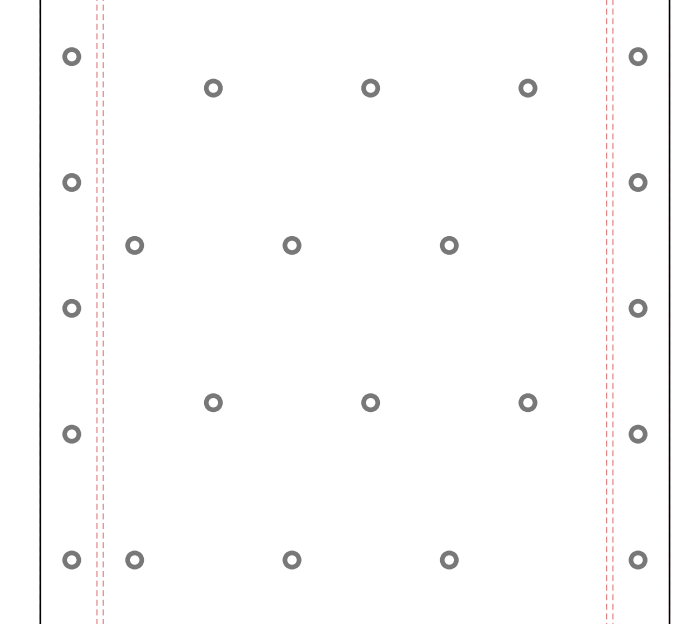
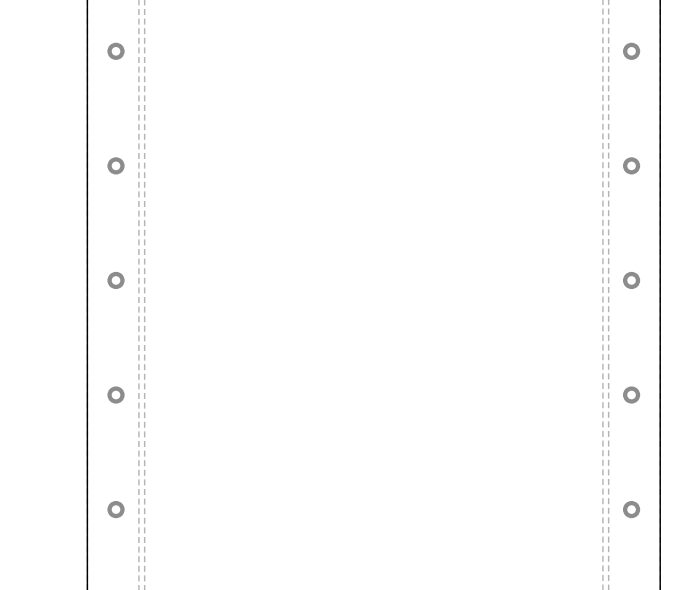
via: (213, 88) -> none
via: (370, 88) -> none
via: (527, 88) -> none
via: (134, 245) -> none
via: (292, 245) -> none
via: (449, 245) -> none
via: (213, 402) -> none
via: (370, 402) -> none
via: (527, 402) -> none
via: (134, 560) -> none
via: (292, 560) -> none
via: (449, 560) -> none

